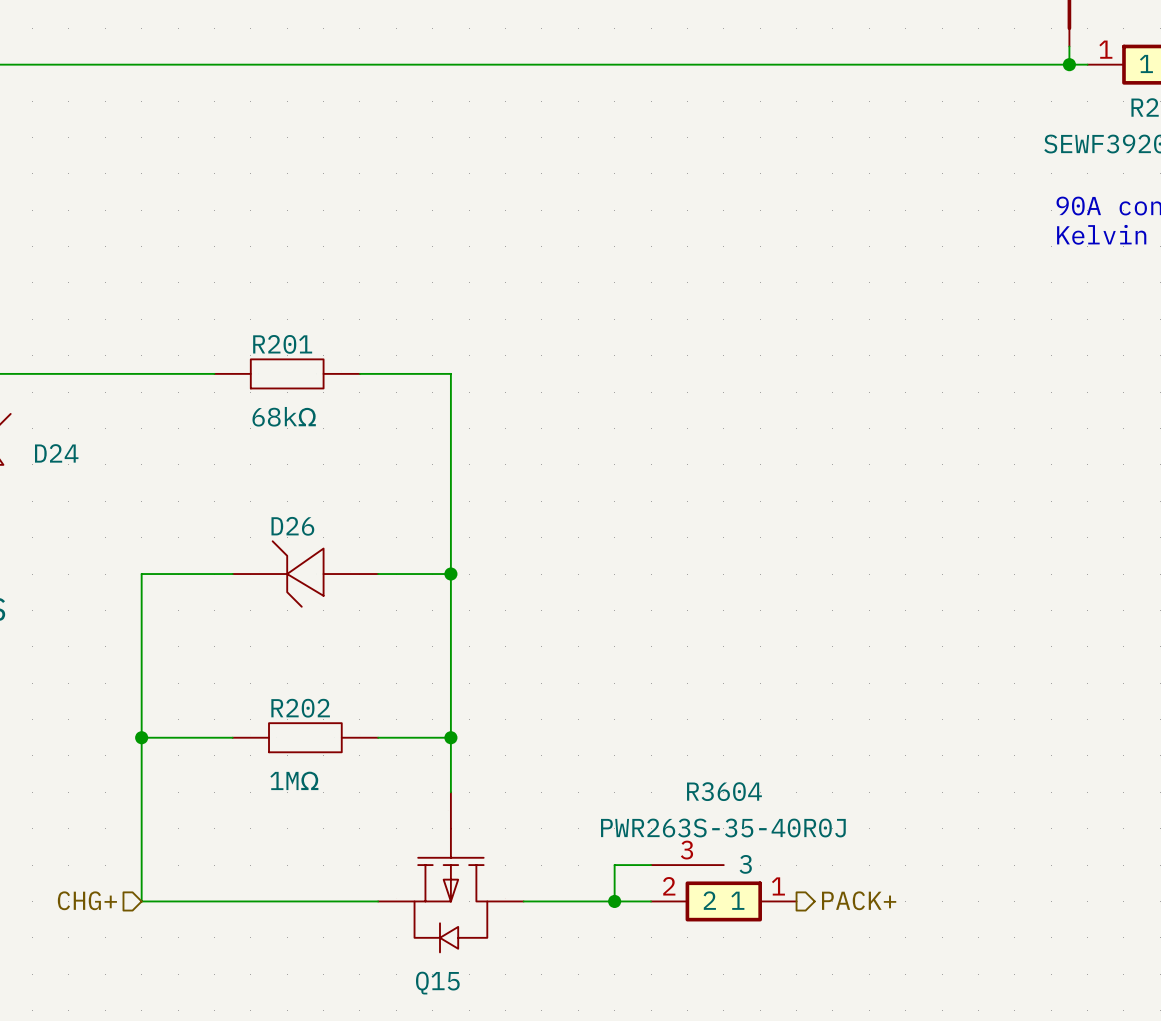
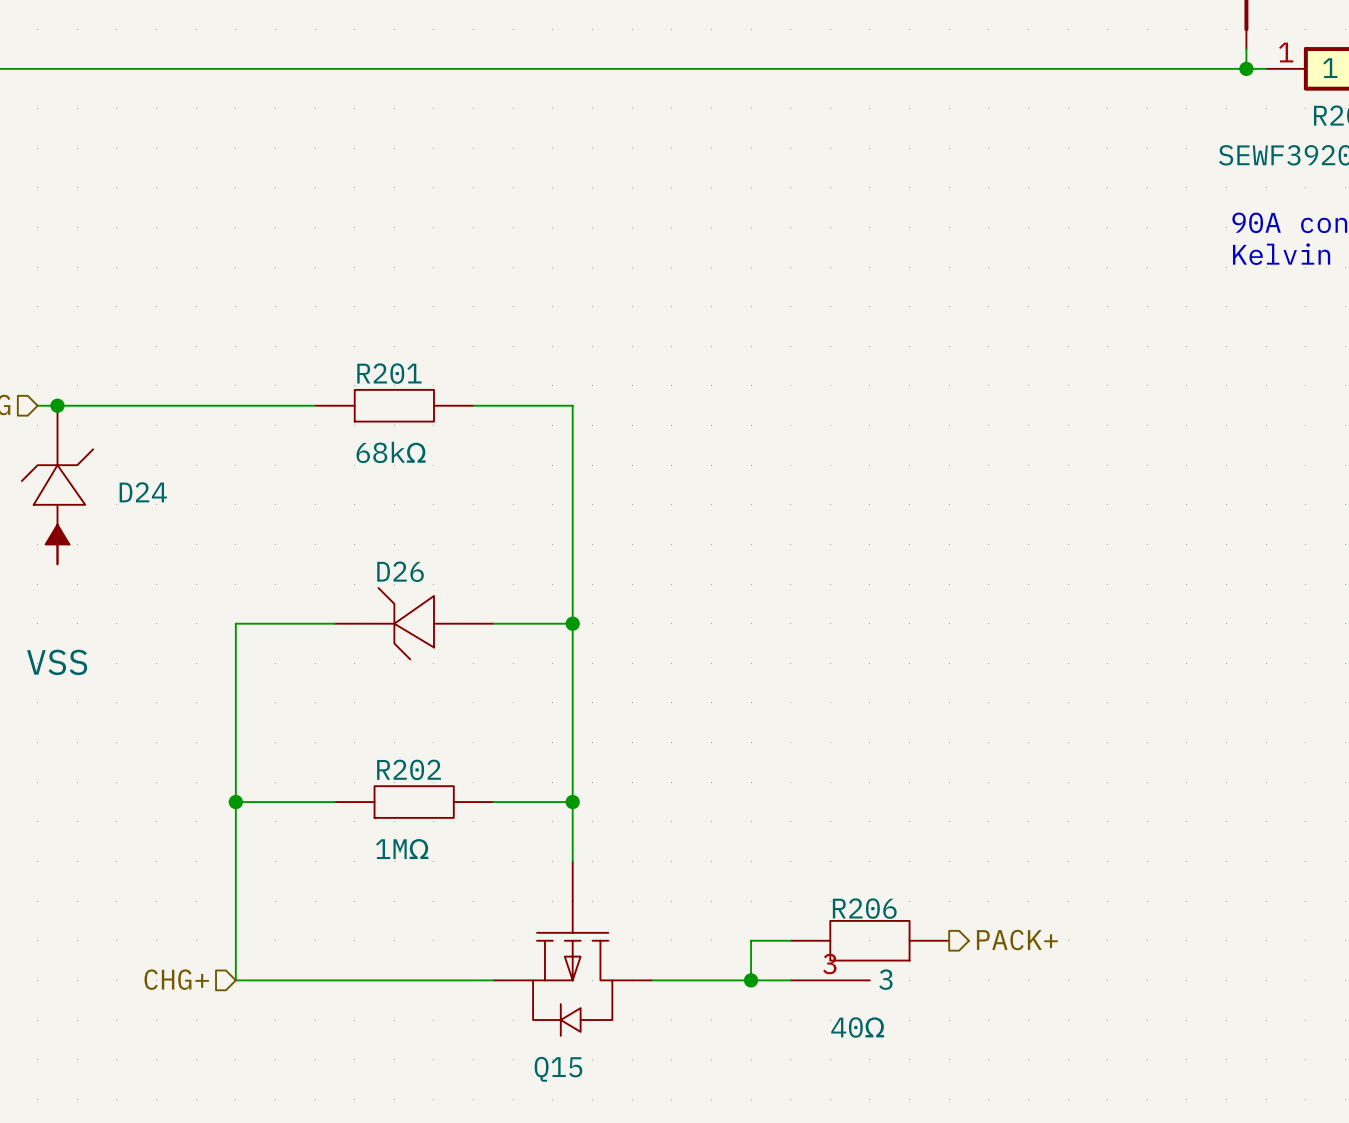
R206: none -> 40Ω (869, 950)
R3604: PWR263S-35-40R0J (723, 893) -> none
hierarchical label position: PACK+ (859, 900) -> PACK+ (1017, 940)

